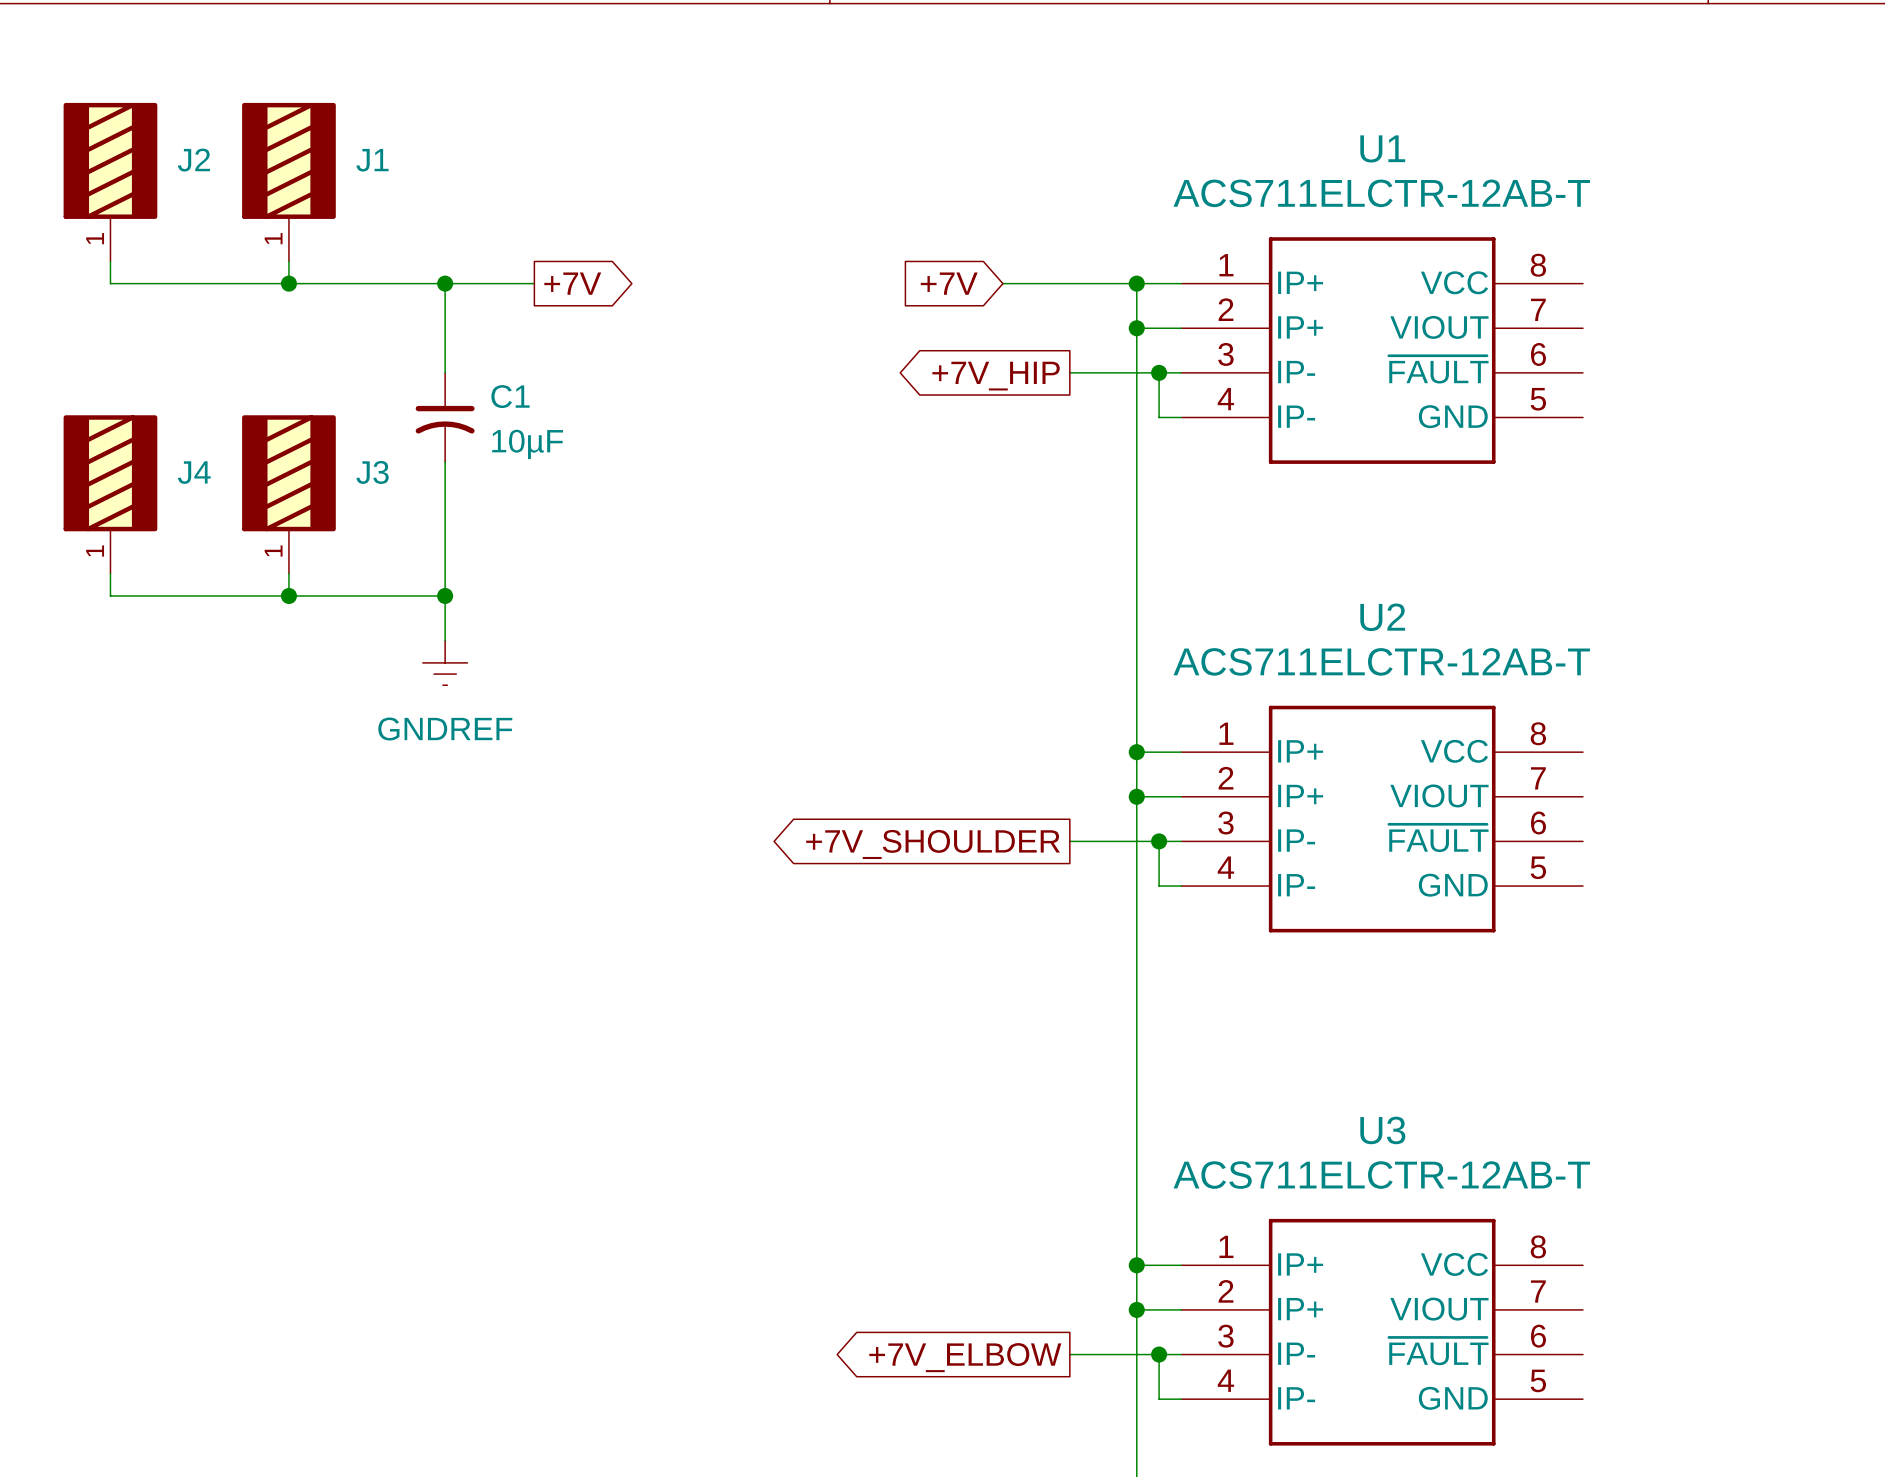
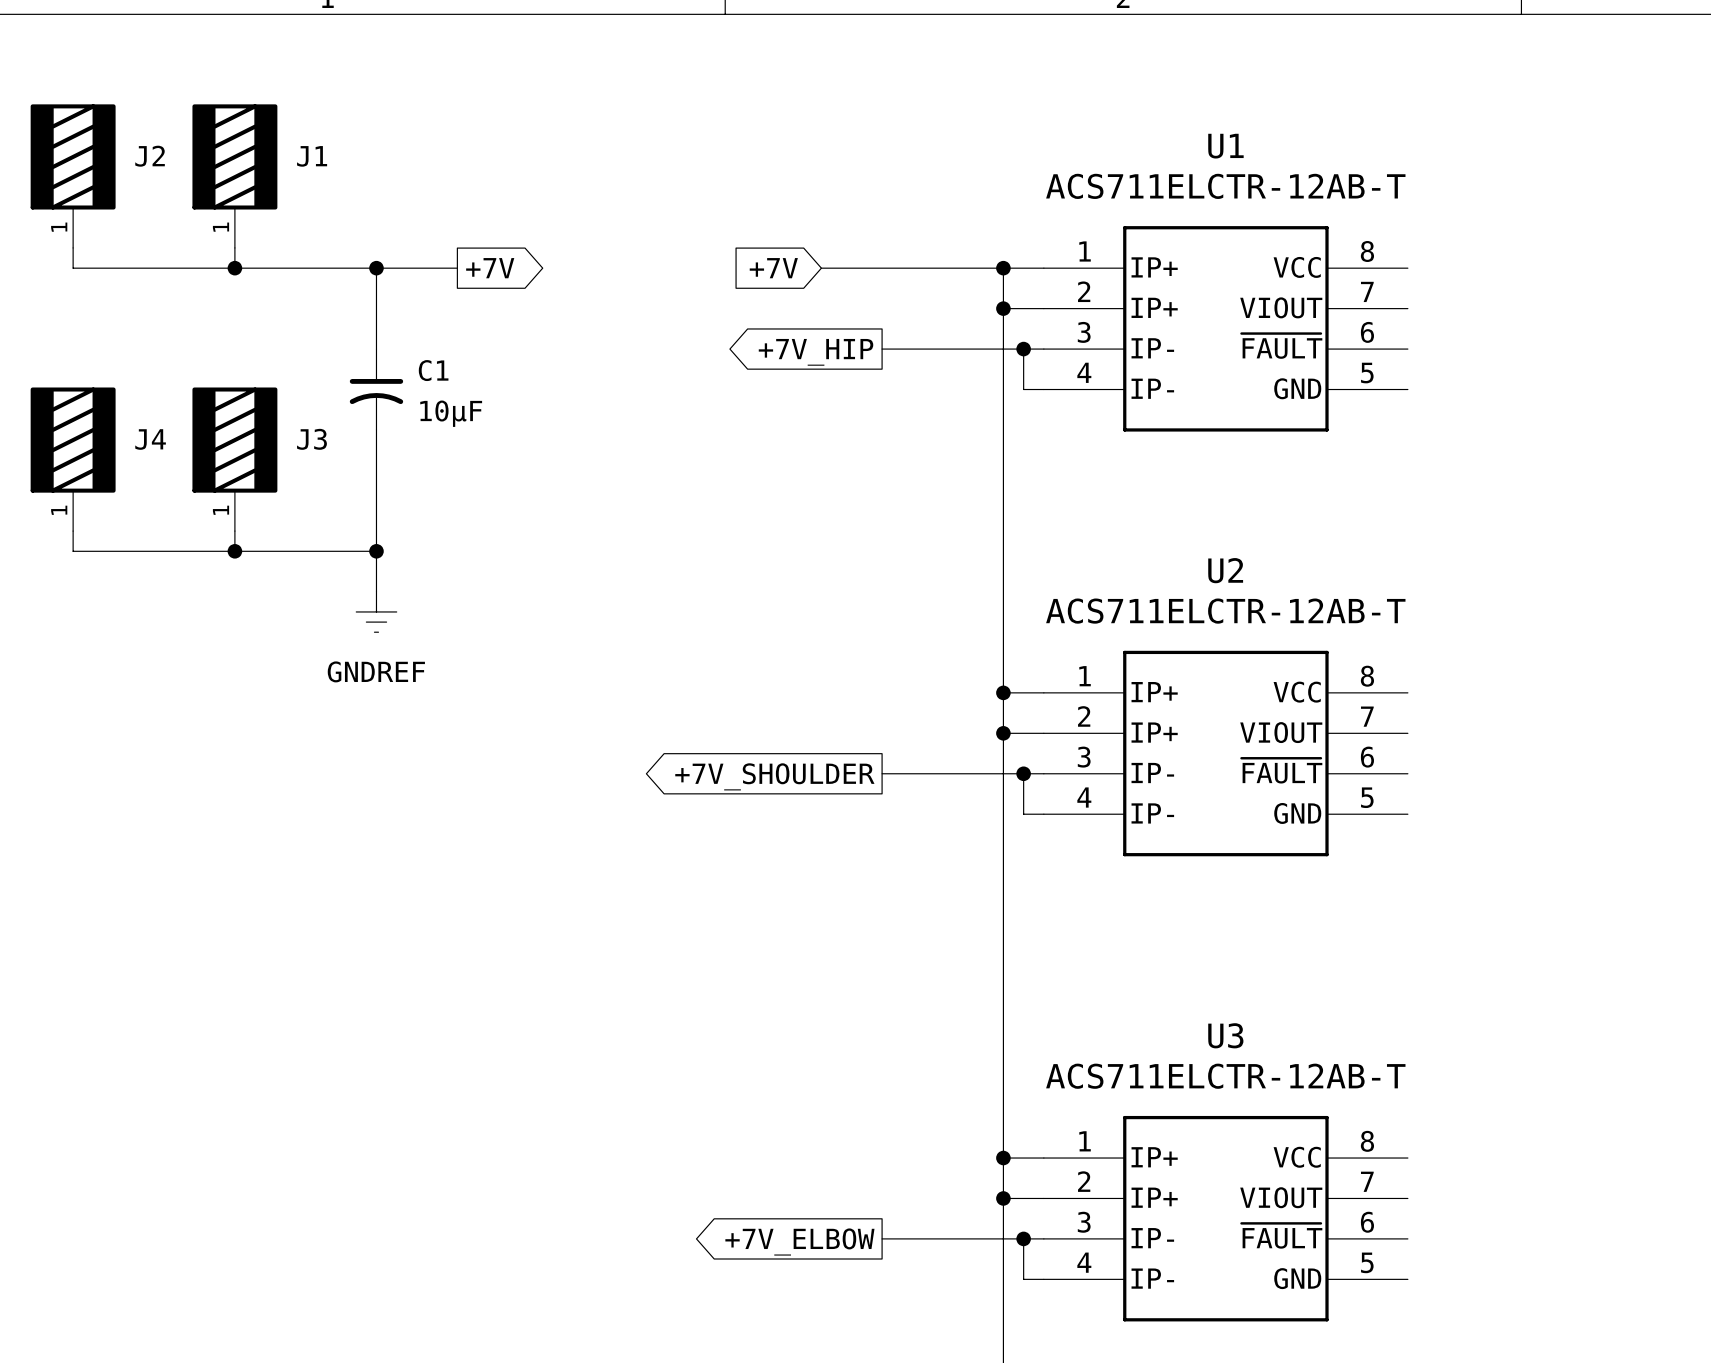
wire: none -> (821, 268) (882, 268)
global label position: +7V (949, 283) -> +7V (773, 268)
wire: none -> (882, 349) (942, 349)
global label position: +7V_HIP (996, 376) -> +7V_HIP (816, 352)
wire: none -> (882, 773) (942, 773)
global label position: +7V_SHOULDER (933, 844) -> +7V_SHOULDER (774, 776)
wire: none -> (882, 1238) (942, 1238)
global label position: +7V_ELBOW (965, 1357) -> +7V_ELBOW (799, 1242)

